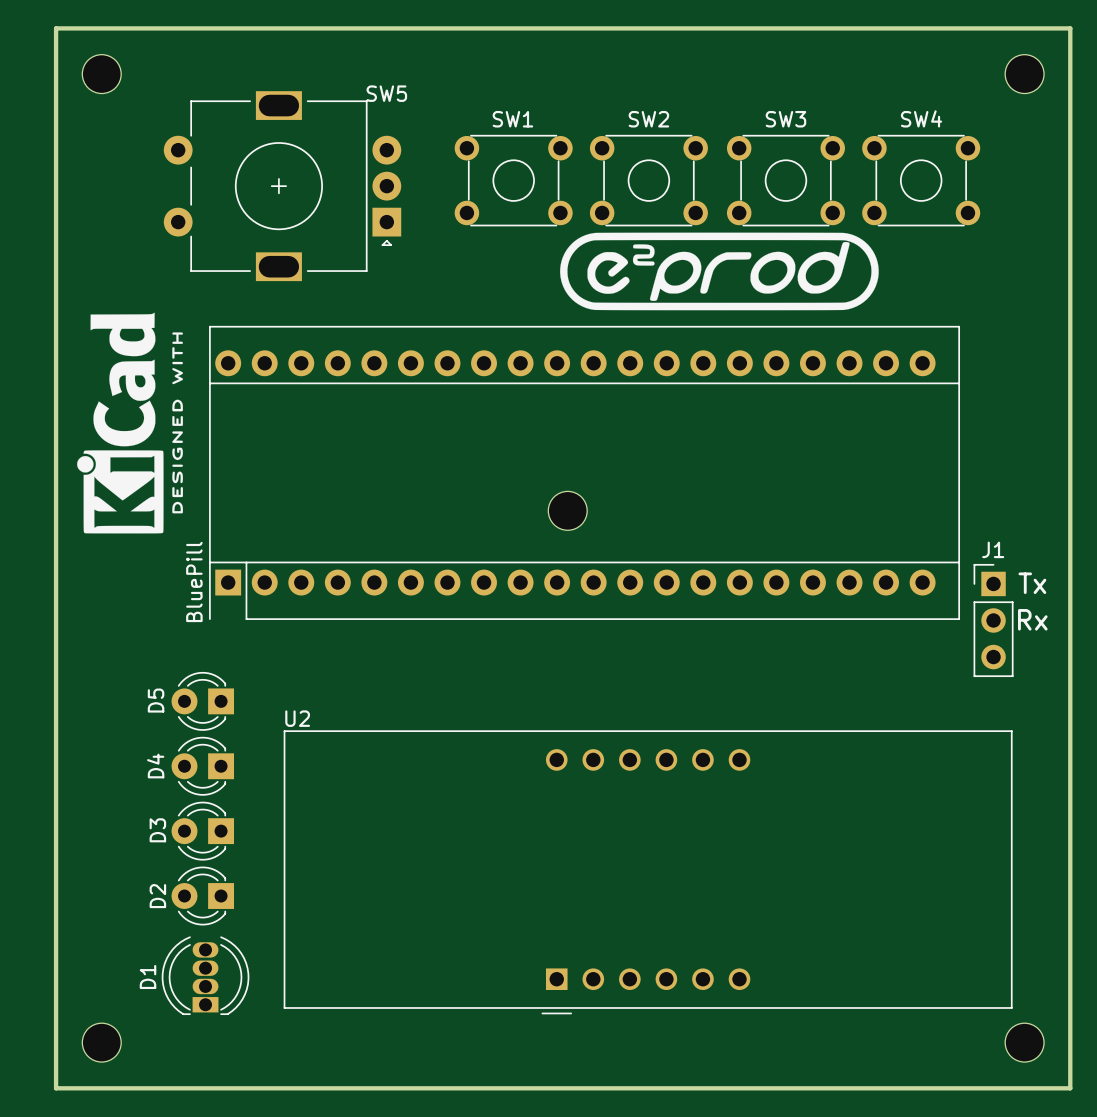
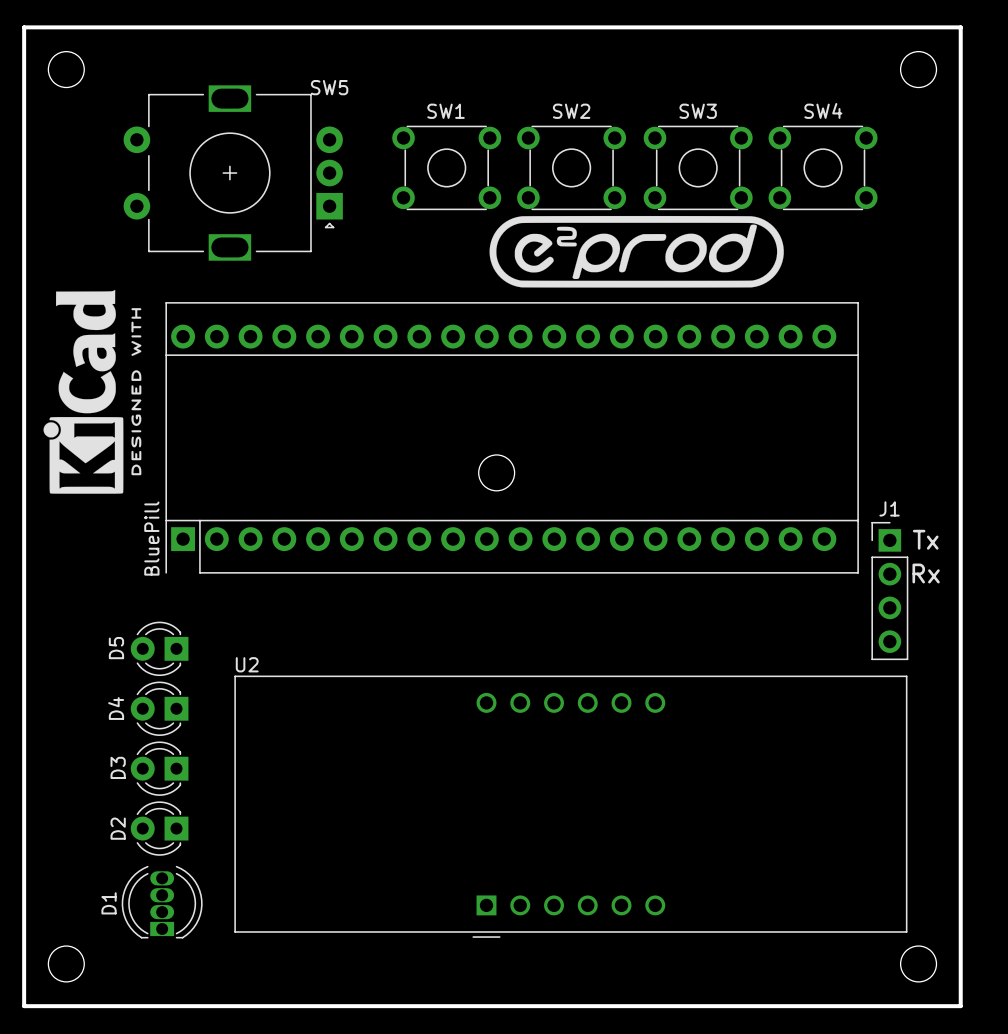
J1 footprint: [973, 563, 1014, 678] -> [871, 521, 909, 661]

